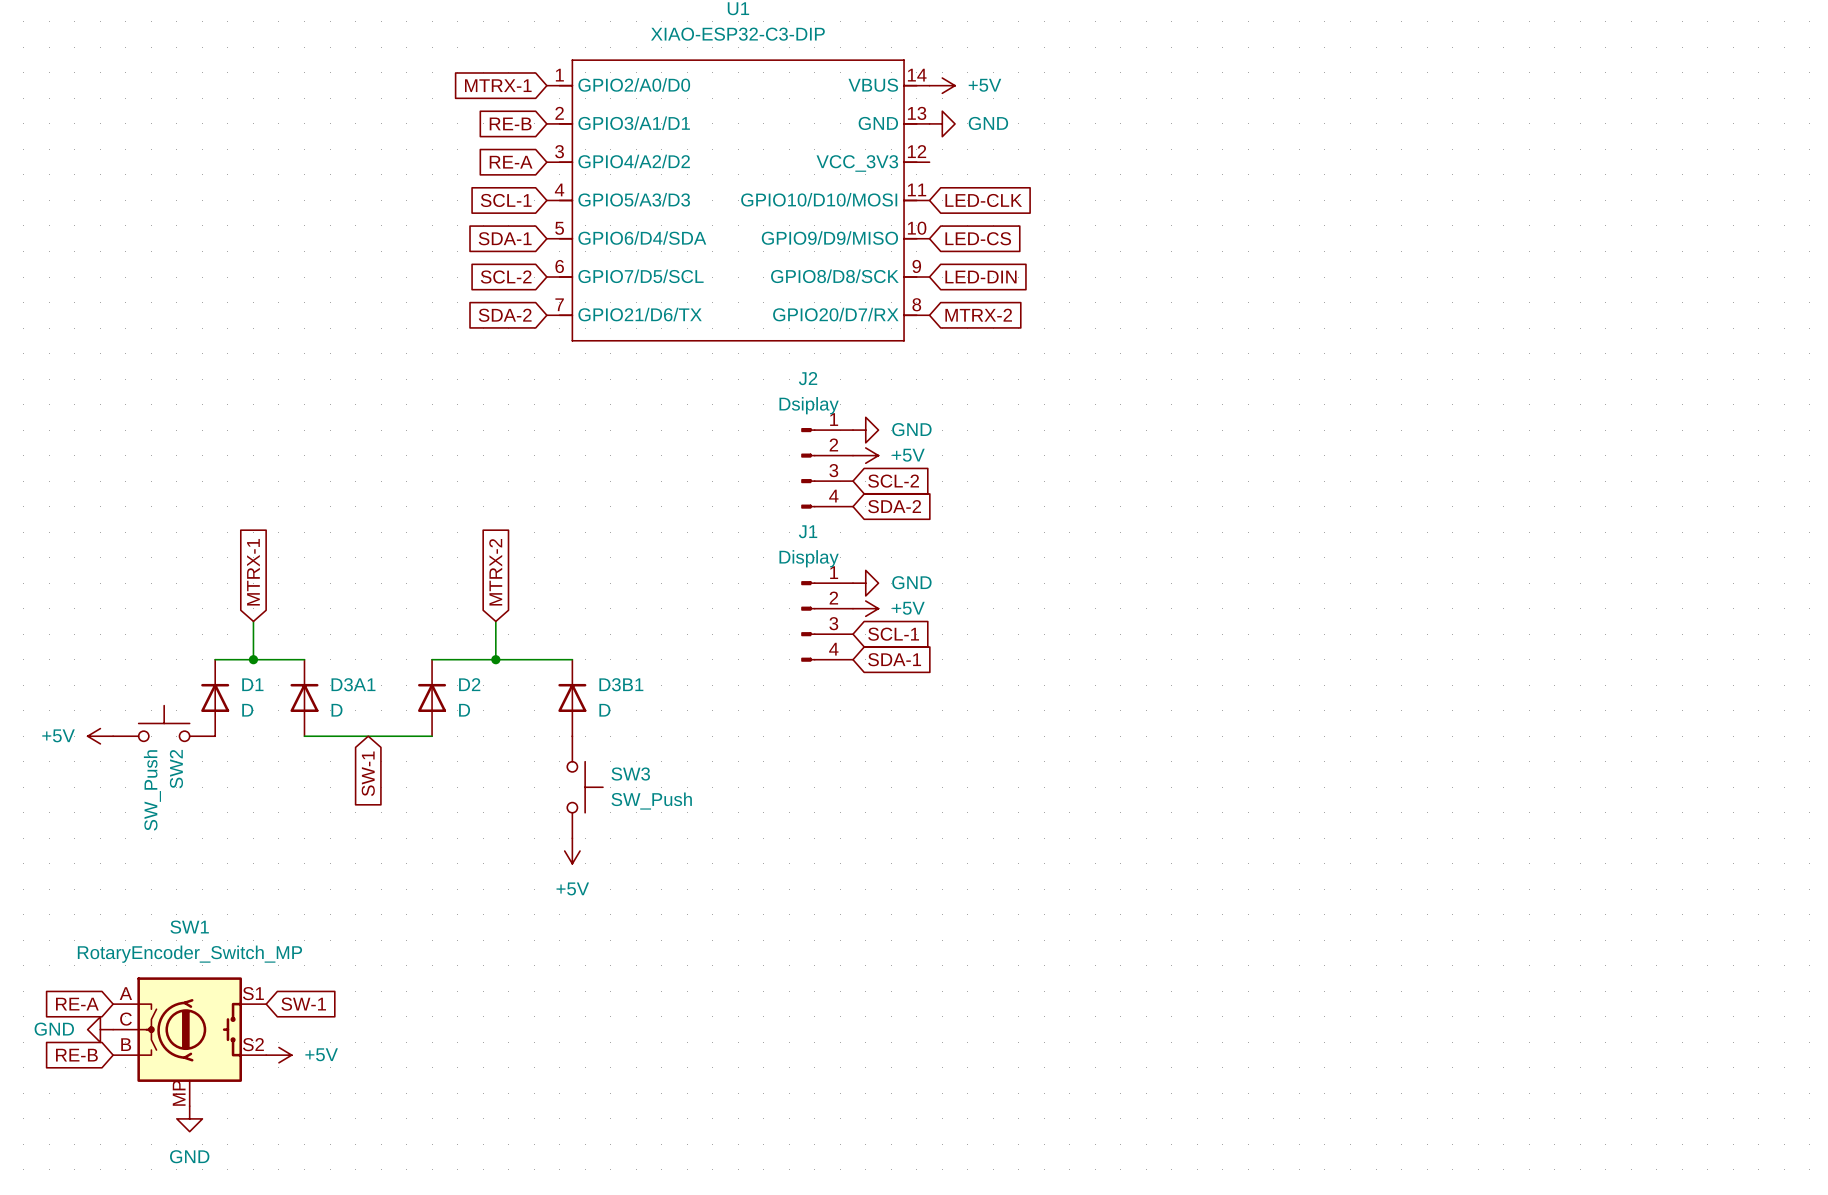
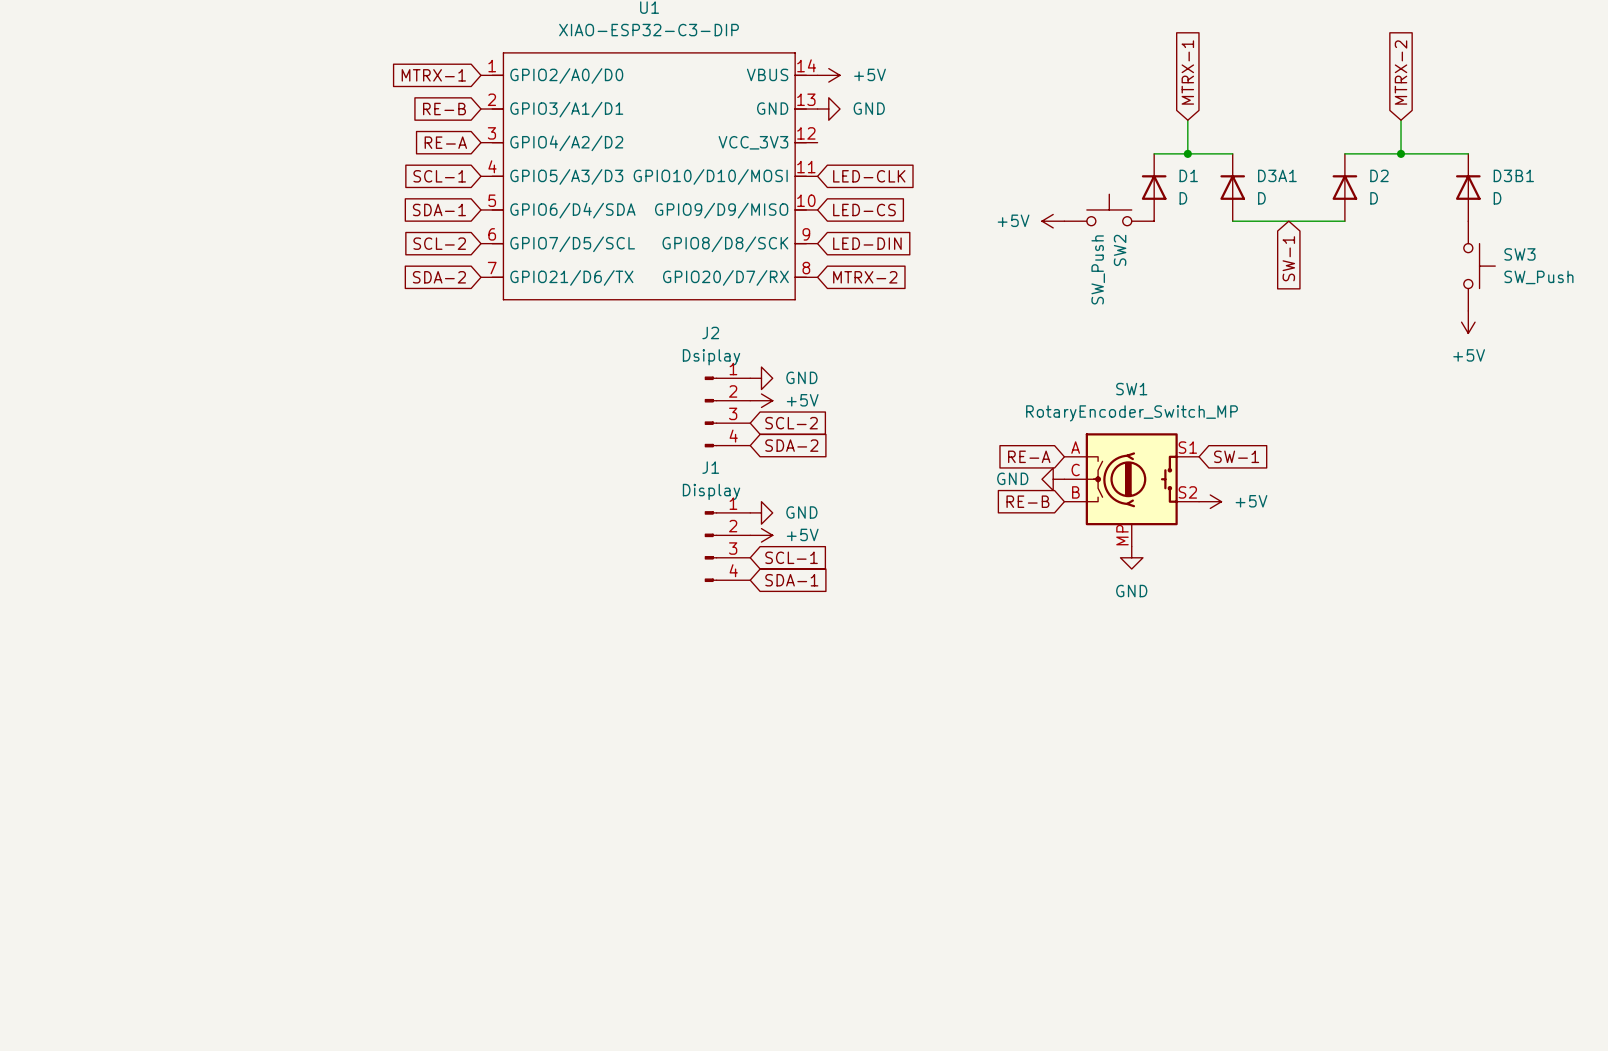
global label: none -> MTRX-1 (1187, 72)
global label: none -> MTRX-2 (1401, 72)
wire: none -> (1187, 120) (1187, 153)
wire: none -> (1401, 120) (1401, 153)
wire: none -> (1154, 153) (1232, 153)
junction: none -> (1187, 153)
wire: none -> (1344, 153) (1468, 153)
junction: none -> (1401, 153)
power symbol: none -> +5V (1053, 221)
wire: none -> (1232, 221) (1344, 221)
global label: none -> SW-1 (1288, 258)
power symbol: none -> +5V (1468, 322)
global label: none -> RE-A (1029, 456)
global label: none -> SW-1 (1236, 456)
power symbol: none -> GND (1053, 479)
global label: none -> RE-B (1027, 501)
power symbol: none -> +5V (1210, 501)
global label: MTRX-1 (253, 572) -> none
global label: MTRX-2 (495, 572) -> none
wire: (253, 621) (253, 659) -> none
wire: (495, 621) (495, 659) -> none
power symbol: none -> GND (1131, 557)
wire: (215, 659) (304, 659) -> none
junction: (253, 659) -> none
wire: (432, 659) (572, 659) -> none
junction: (495, 659) -> none
D1 position: (215, 697) -> (1154, 187)
D3A1 position: (304, 697) -> (1232, 187)
D2 position: (432, 697) -> (1344, 187)
D3B1 position: (572, 697) -> (1468, 187)
SW2 position: (164, 723) -> (1109, 209)
power symbol: +5V (100, 736) -> none
wire: (304, 736) (432, 736) -> none
global label: SW-1 (368, 773) -> none
SW3 position: (585, 787) -> (1479, 266)
power symbol: +5V (572, 851) -> none
global label: RE-A (77, 1004) -> none
global label: SW-1 (303, 1004) -> none
power symbol: GND (100, 1029) -> none
SW1 position: (189, 1041) -> (1131, 489)
global label: RE-B (76, 1055) -> none
power symbol: +5V (278, 1055) -> none
power symbol: GND (189, 1118) -> none

